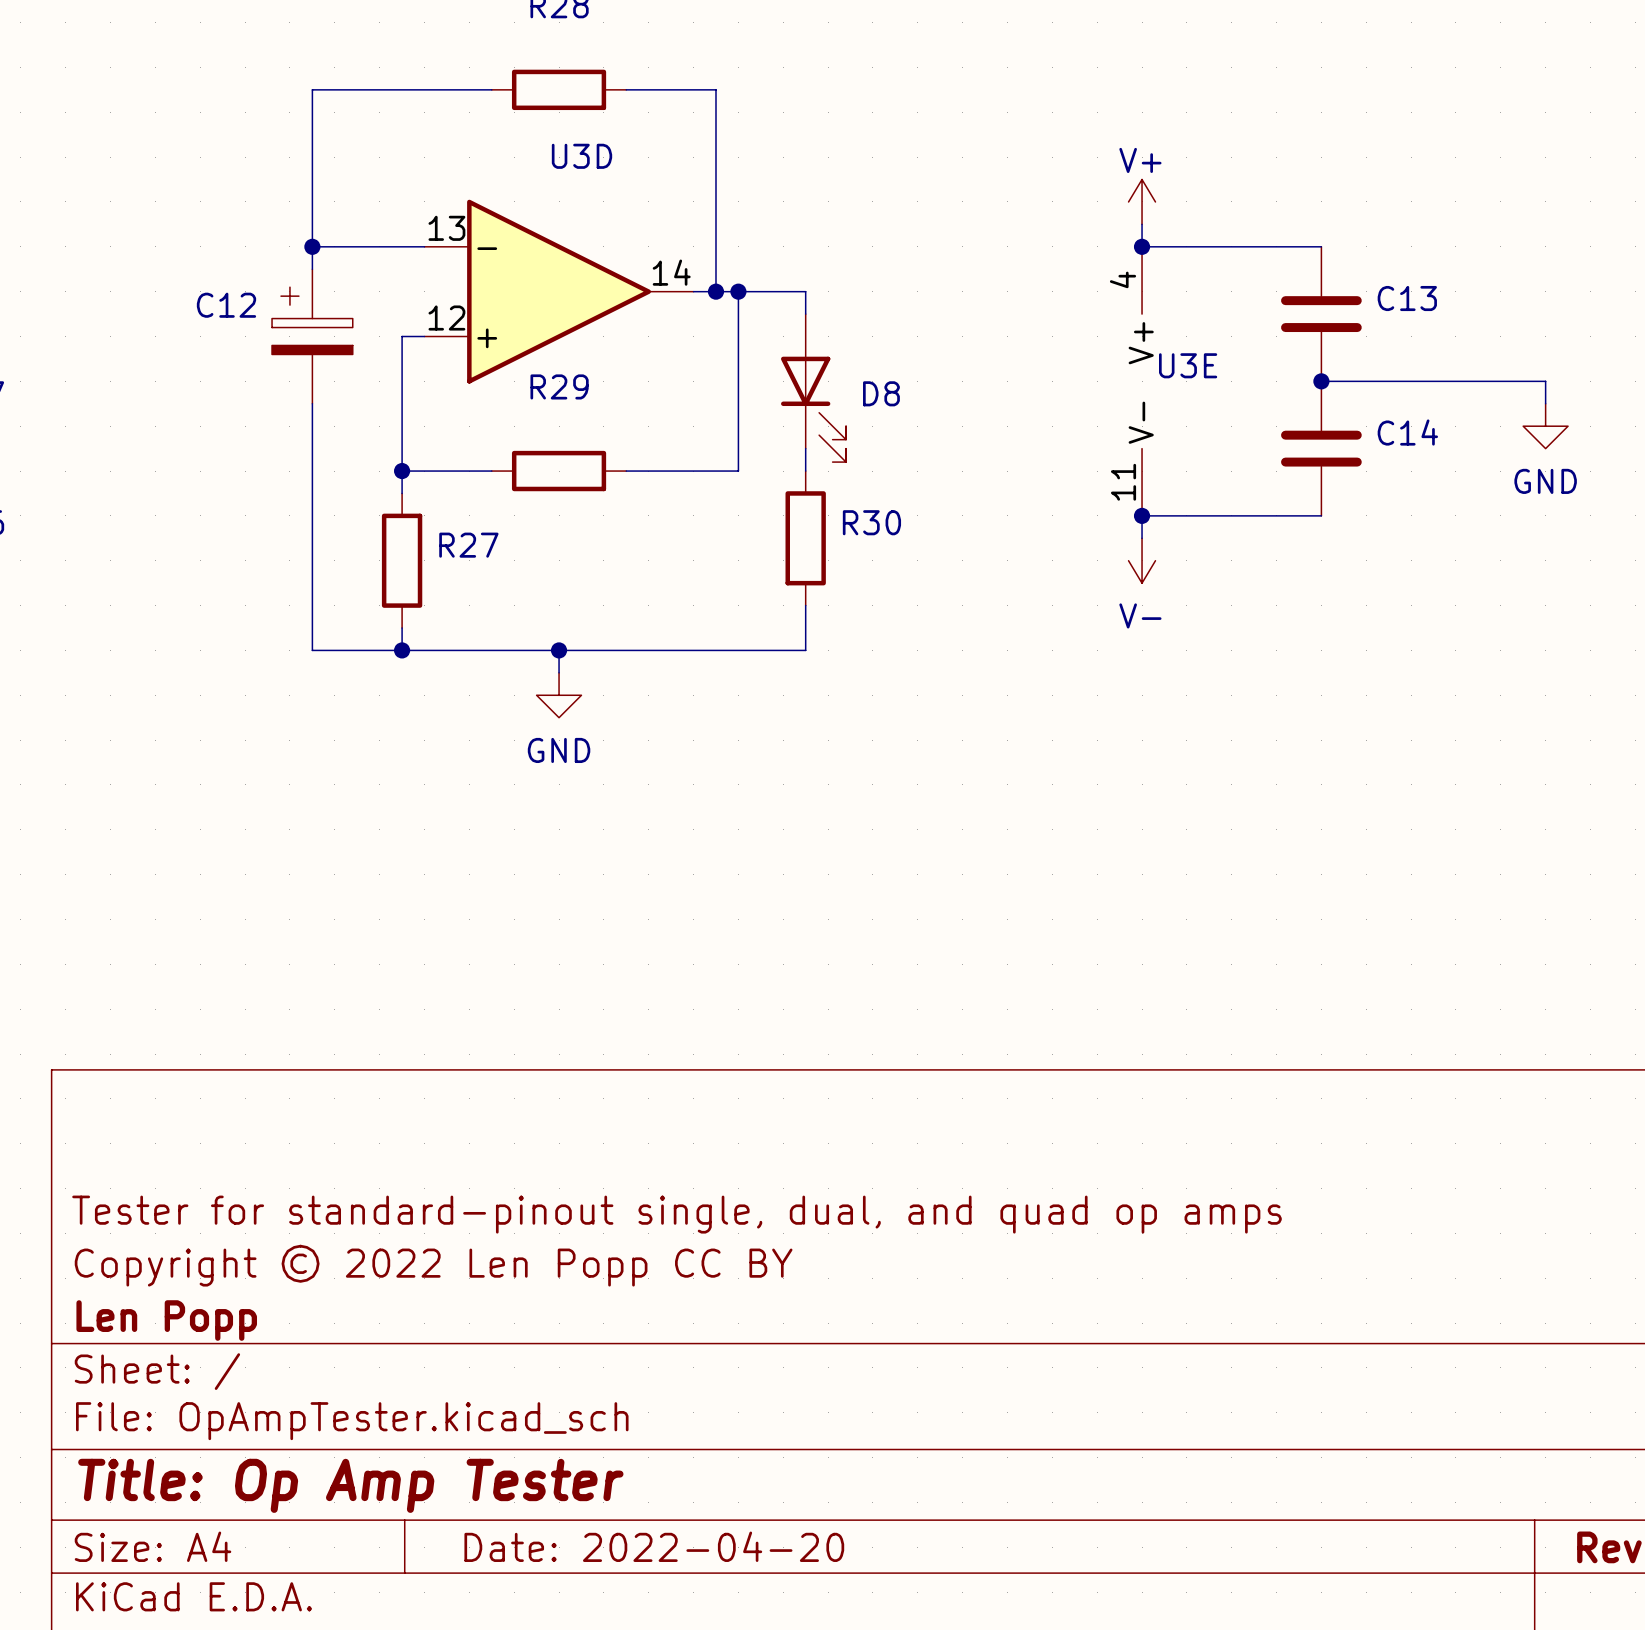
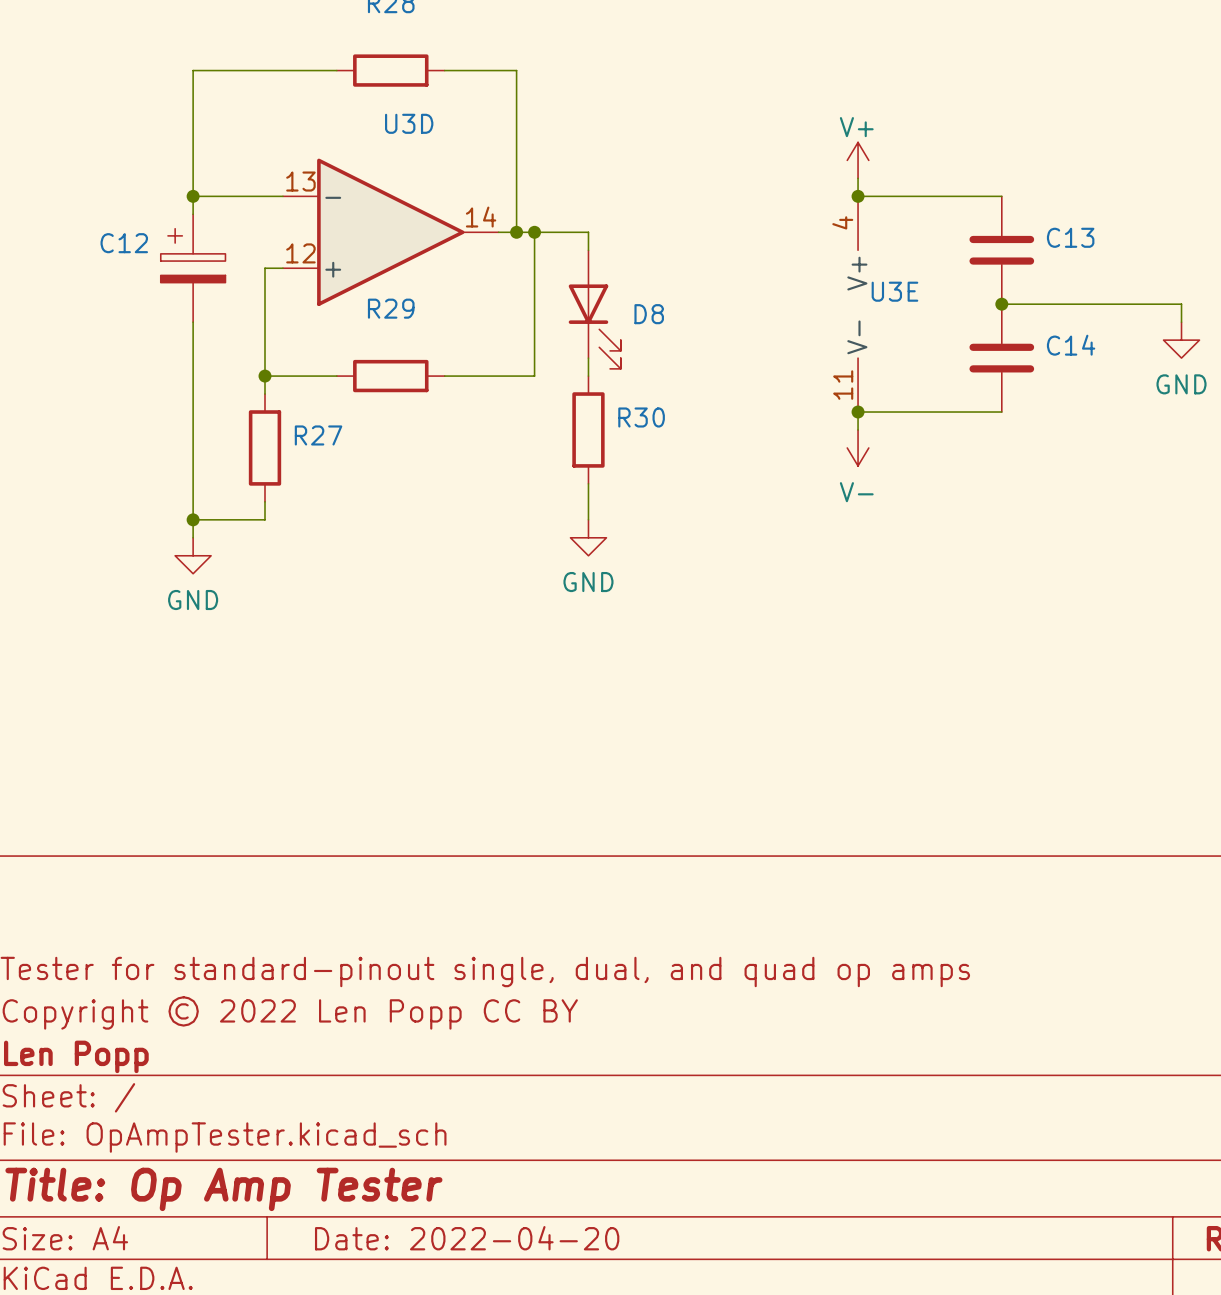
wire: (402, 650) (805, 650) -> none
junction position: (402, 650) -> (193, 519)
wire: (559, 650) (559, 672) -> (193, 519) (193, 537)
junction: (559, 650) -> none
power symbol: none -> GND (588, 537)
power symbol: none -> GND (193, 555)
power symbol: GND (559, 695) -> none

